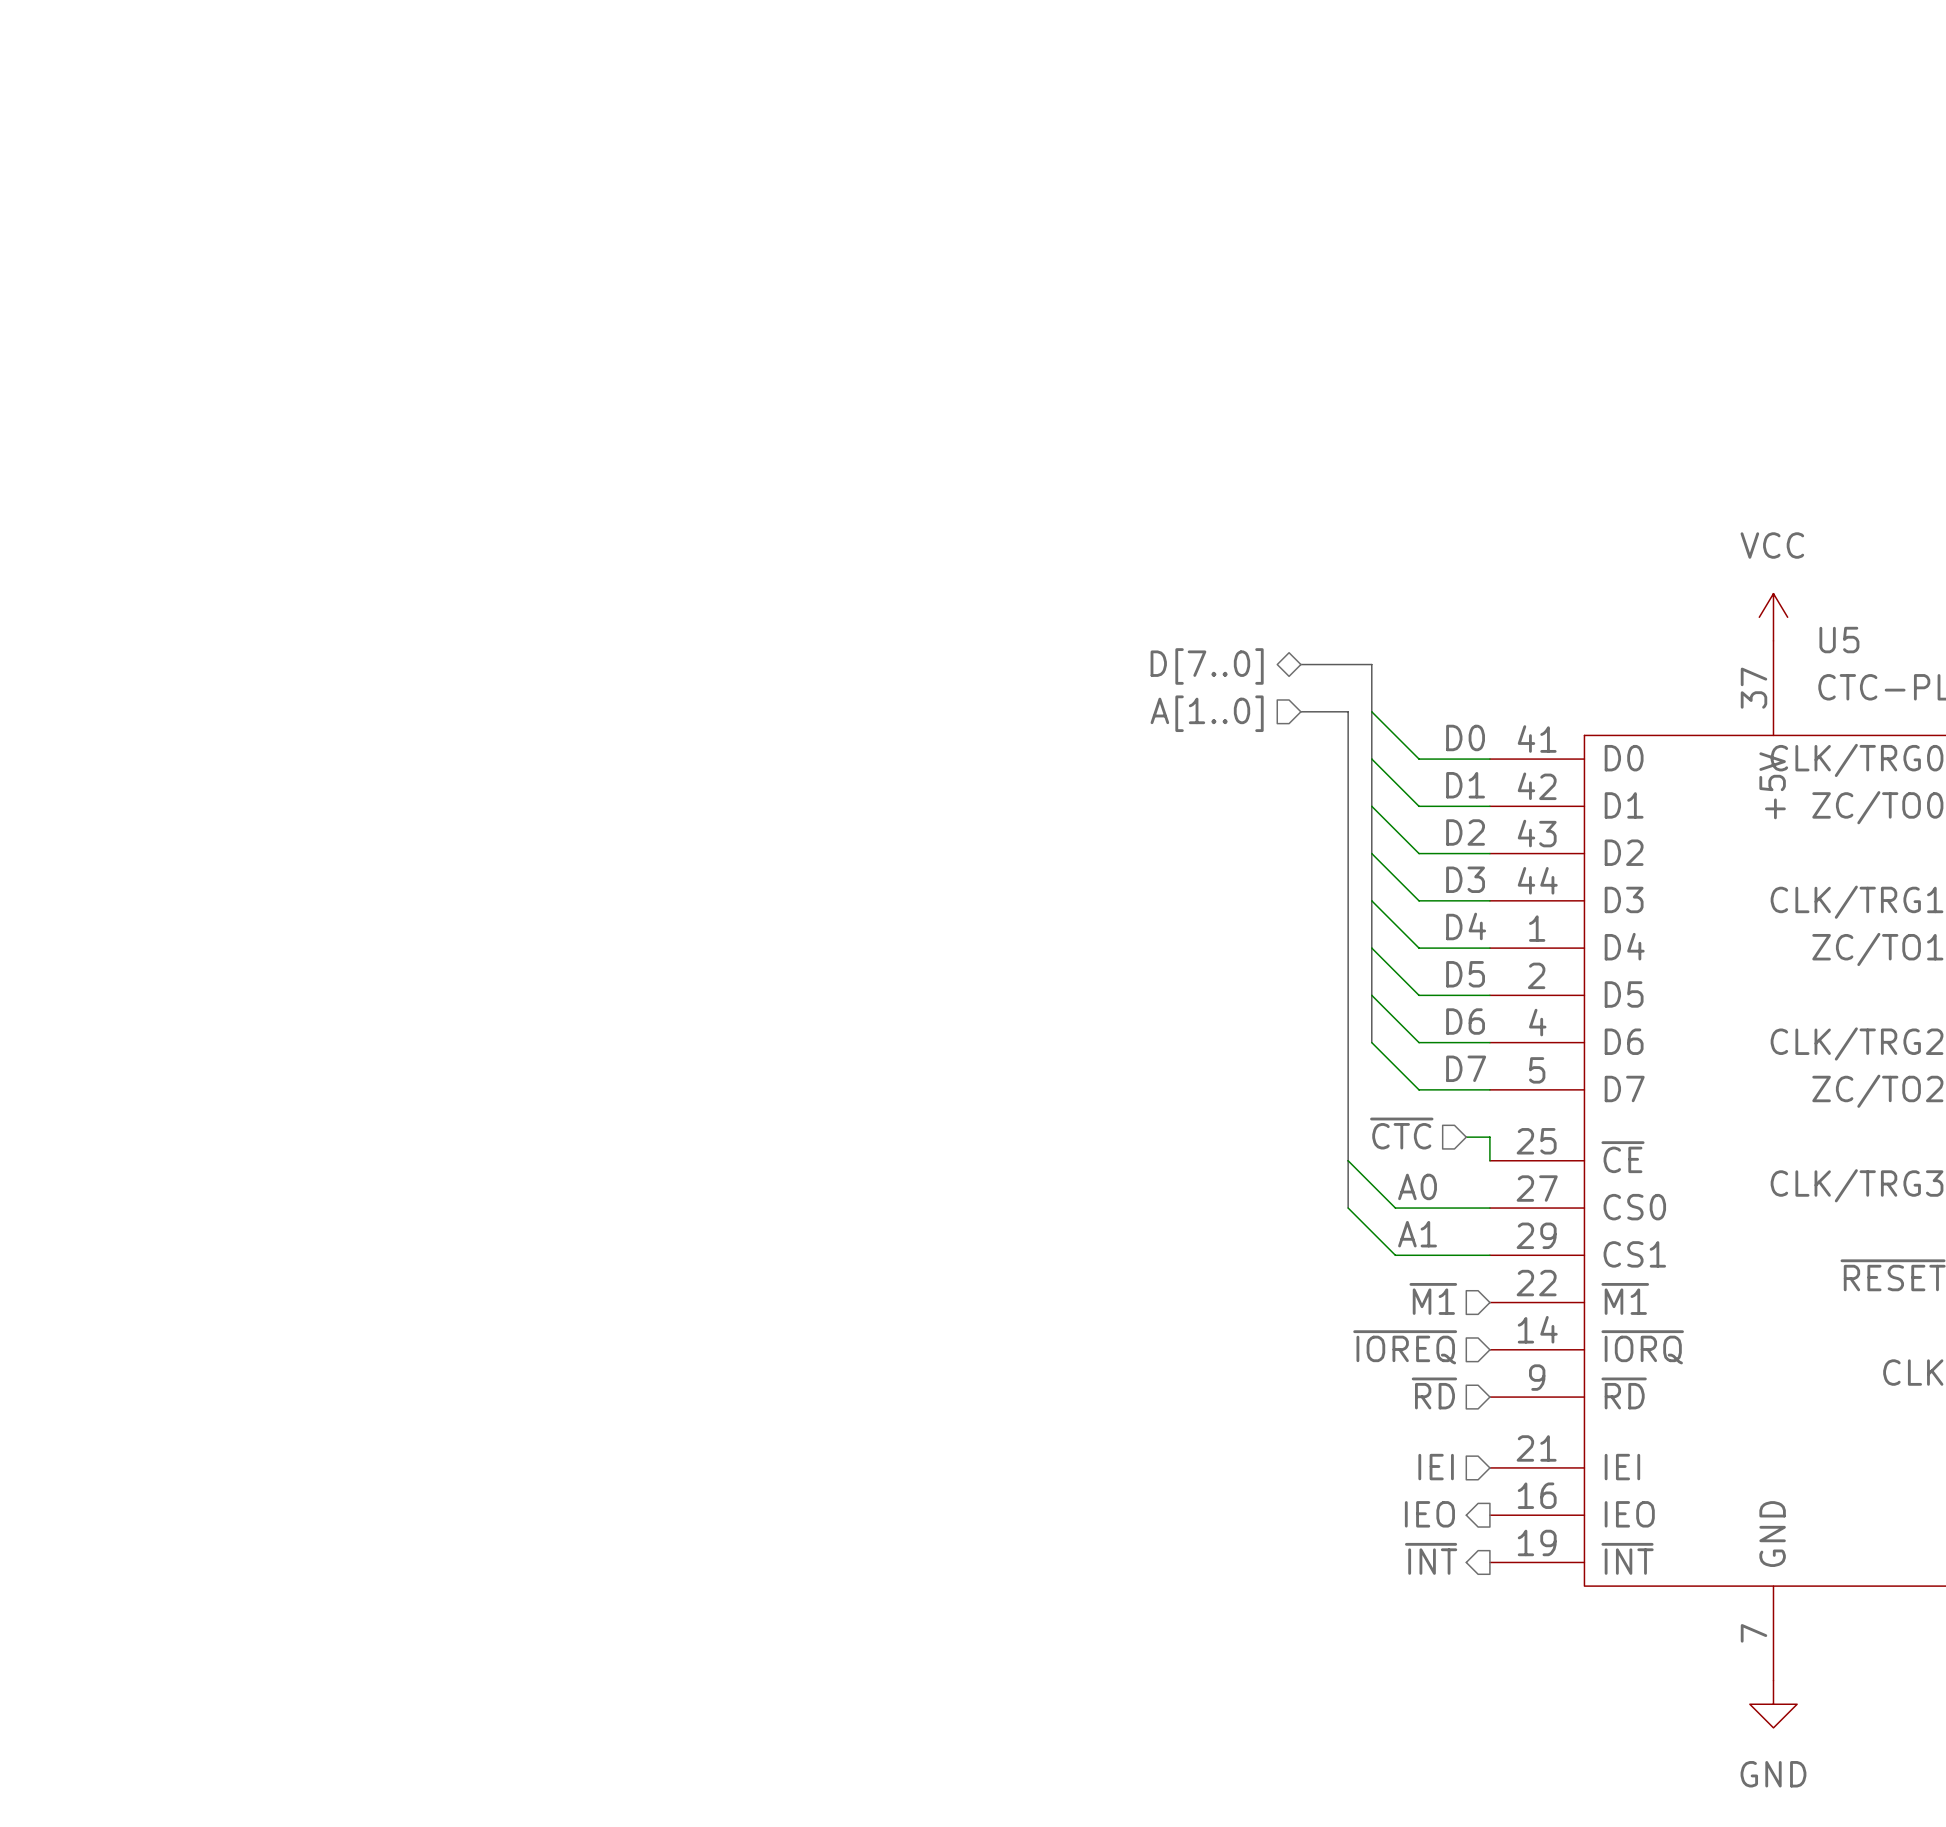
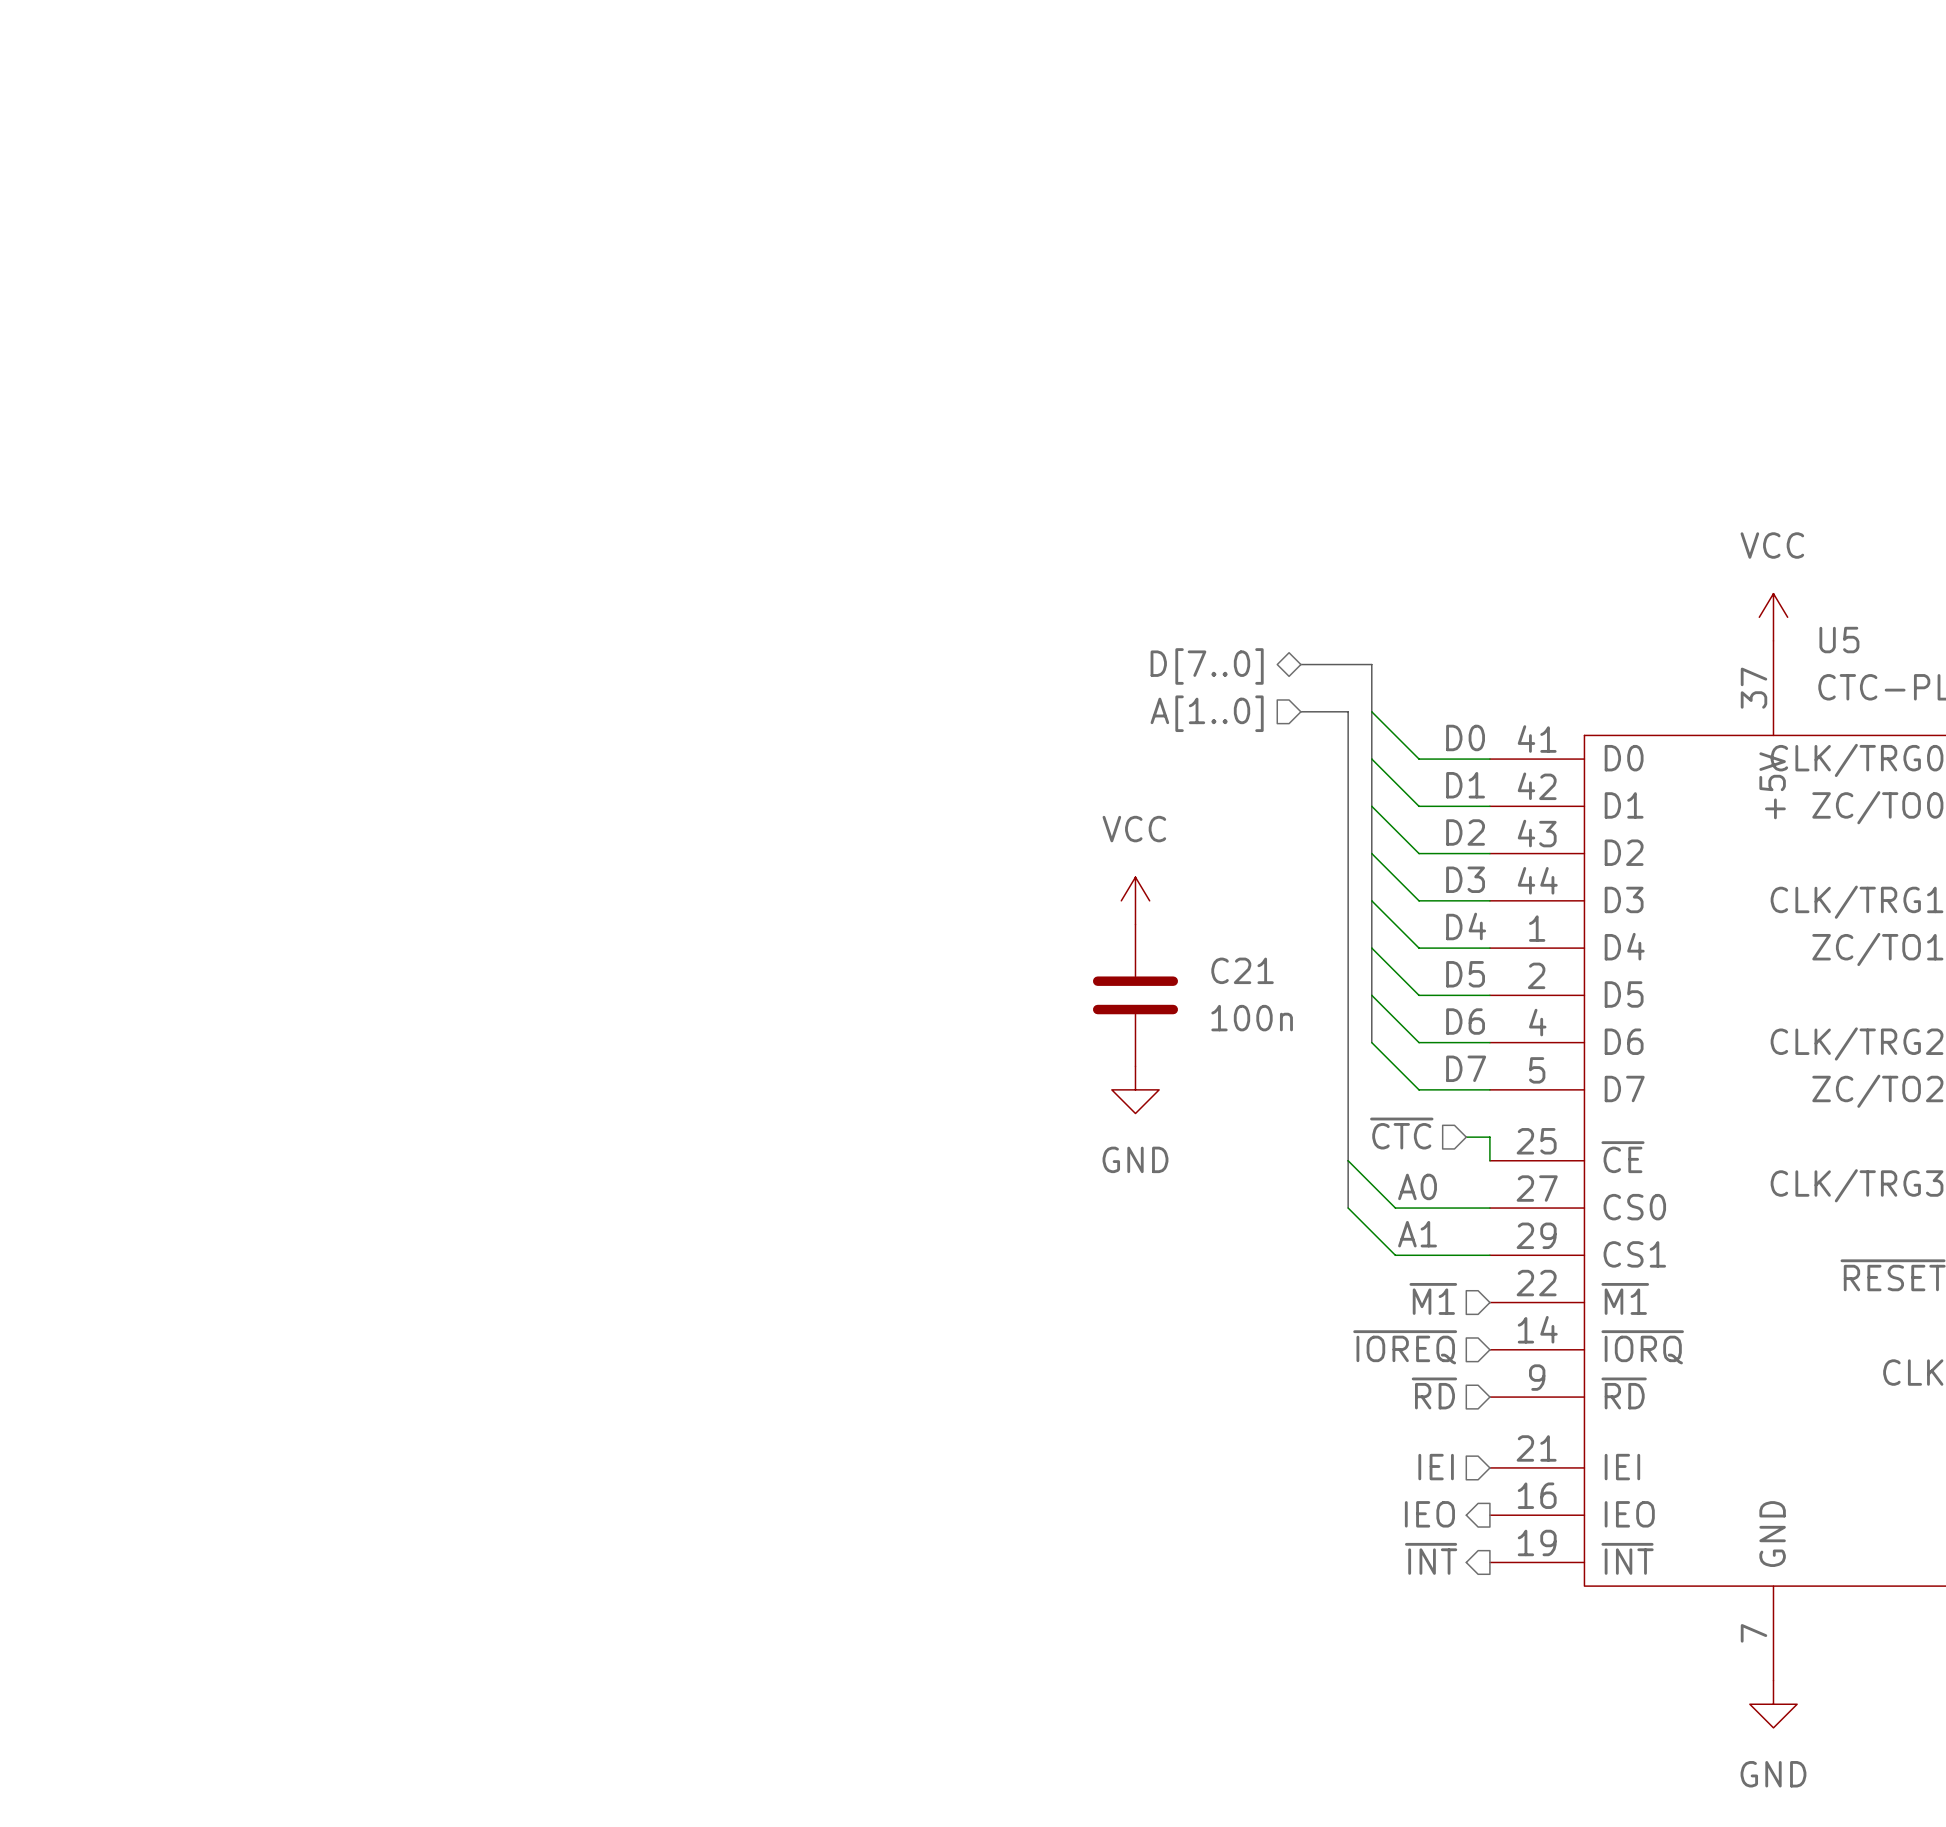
power symbol: none -> VCC (1135, 900)
C21: none -> 100n (1135, 995)
power symbol: none -> GND (1135, 1089)

